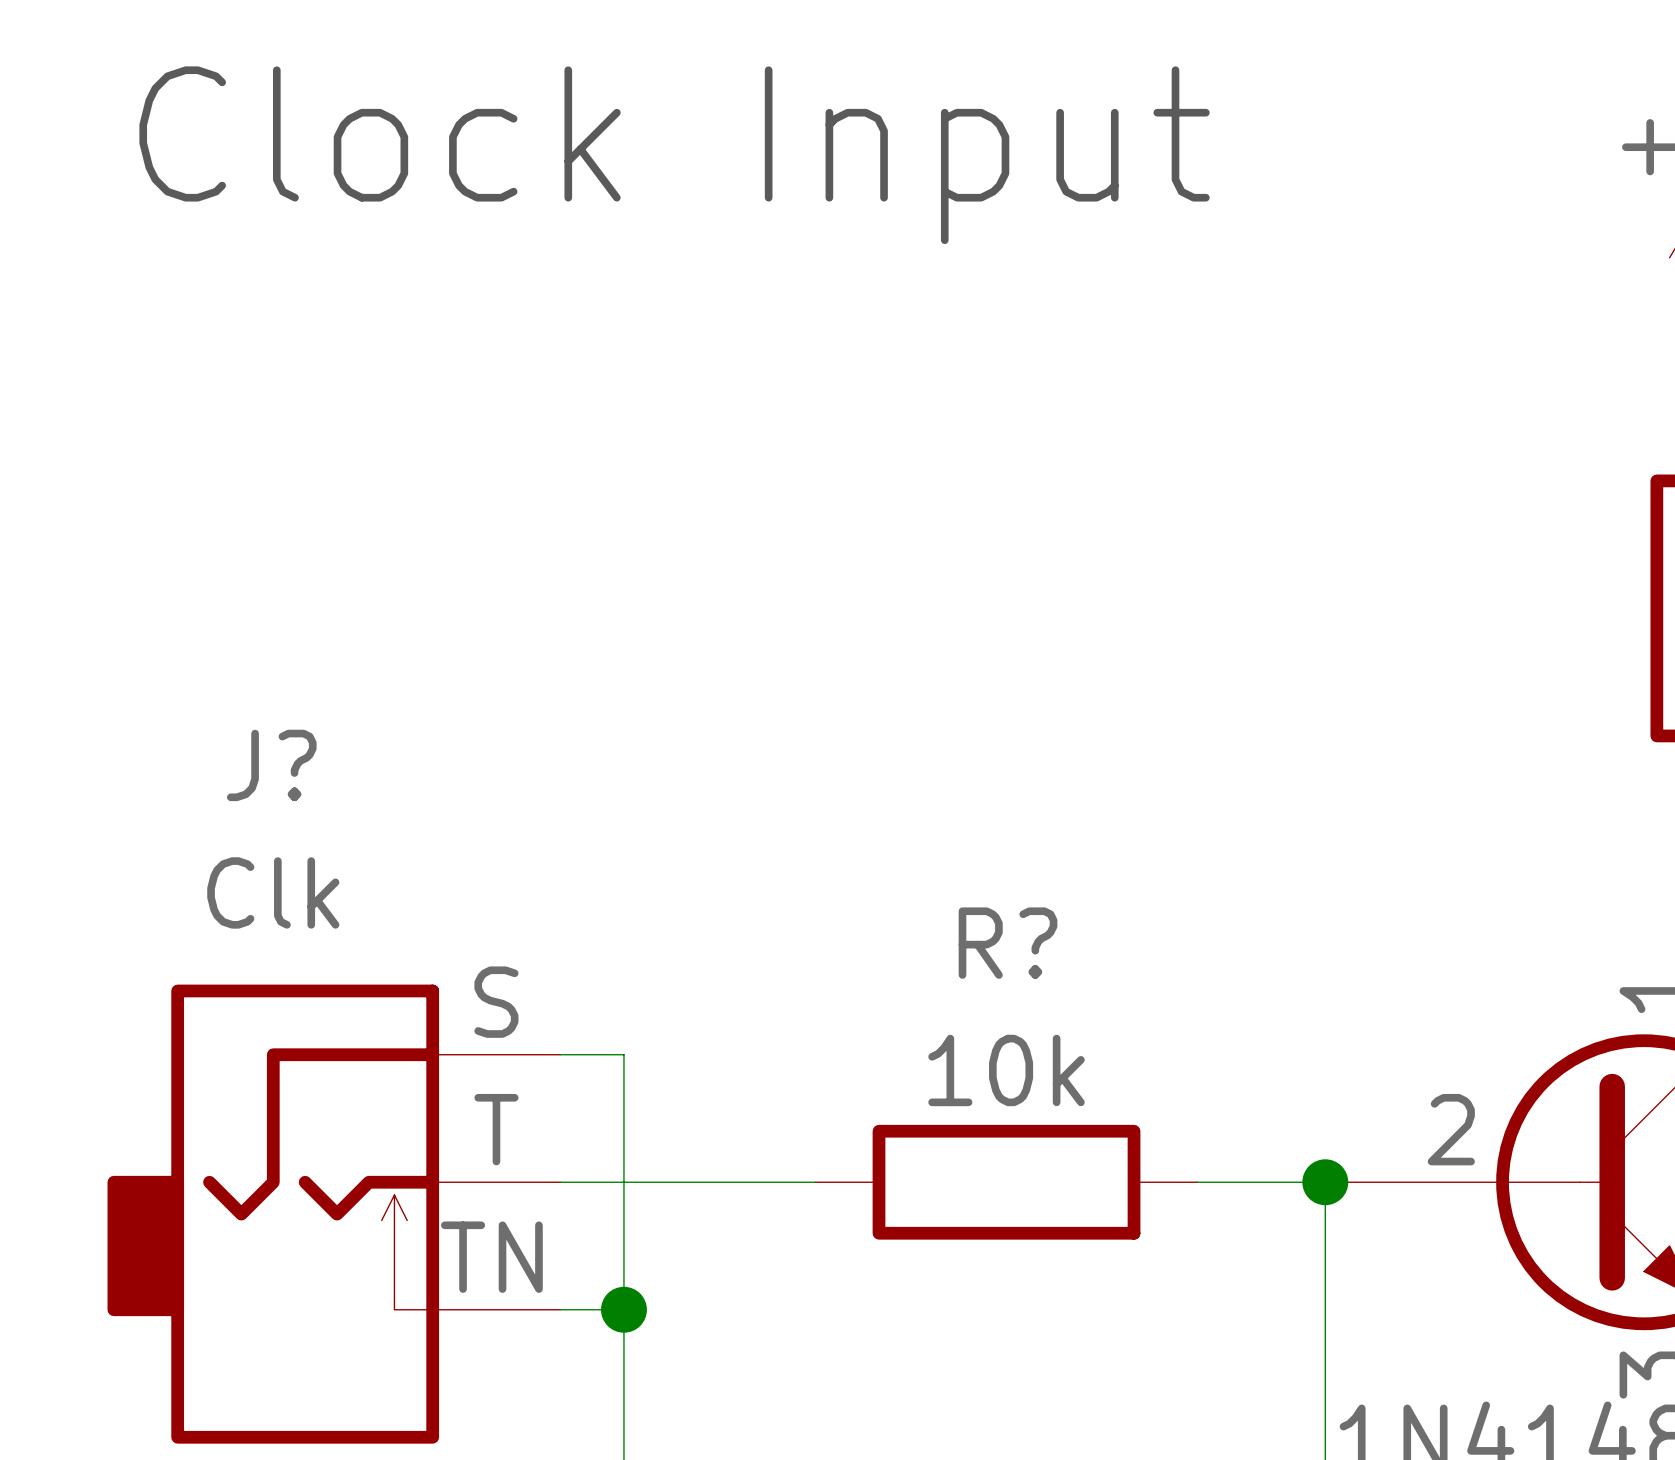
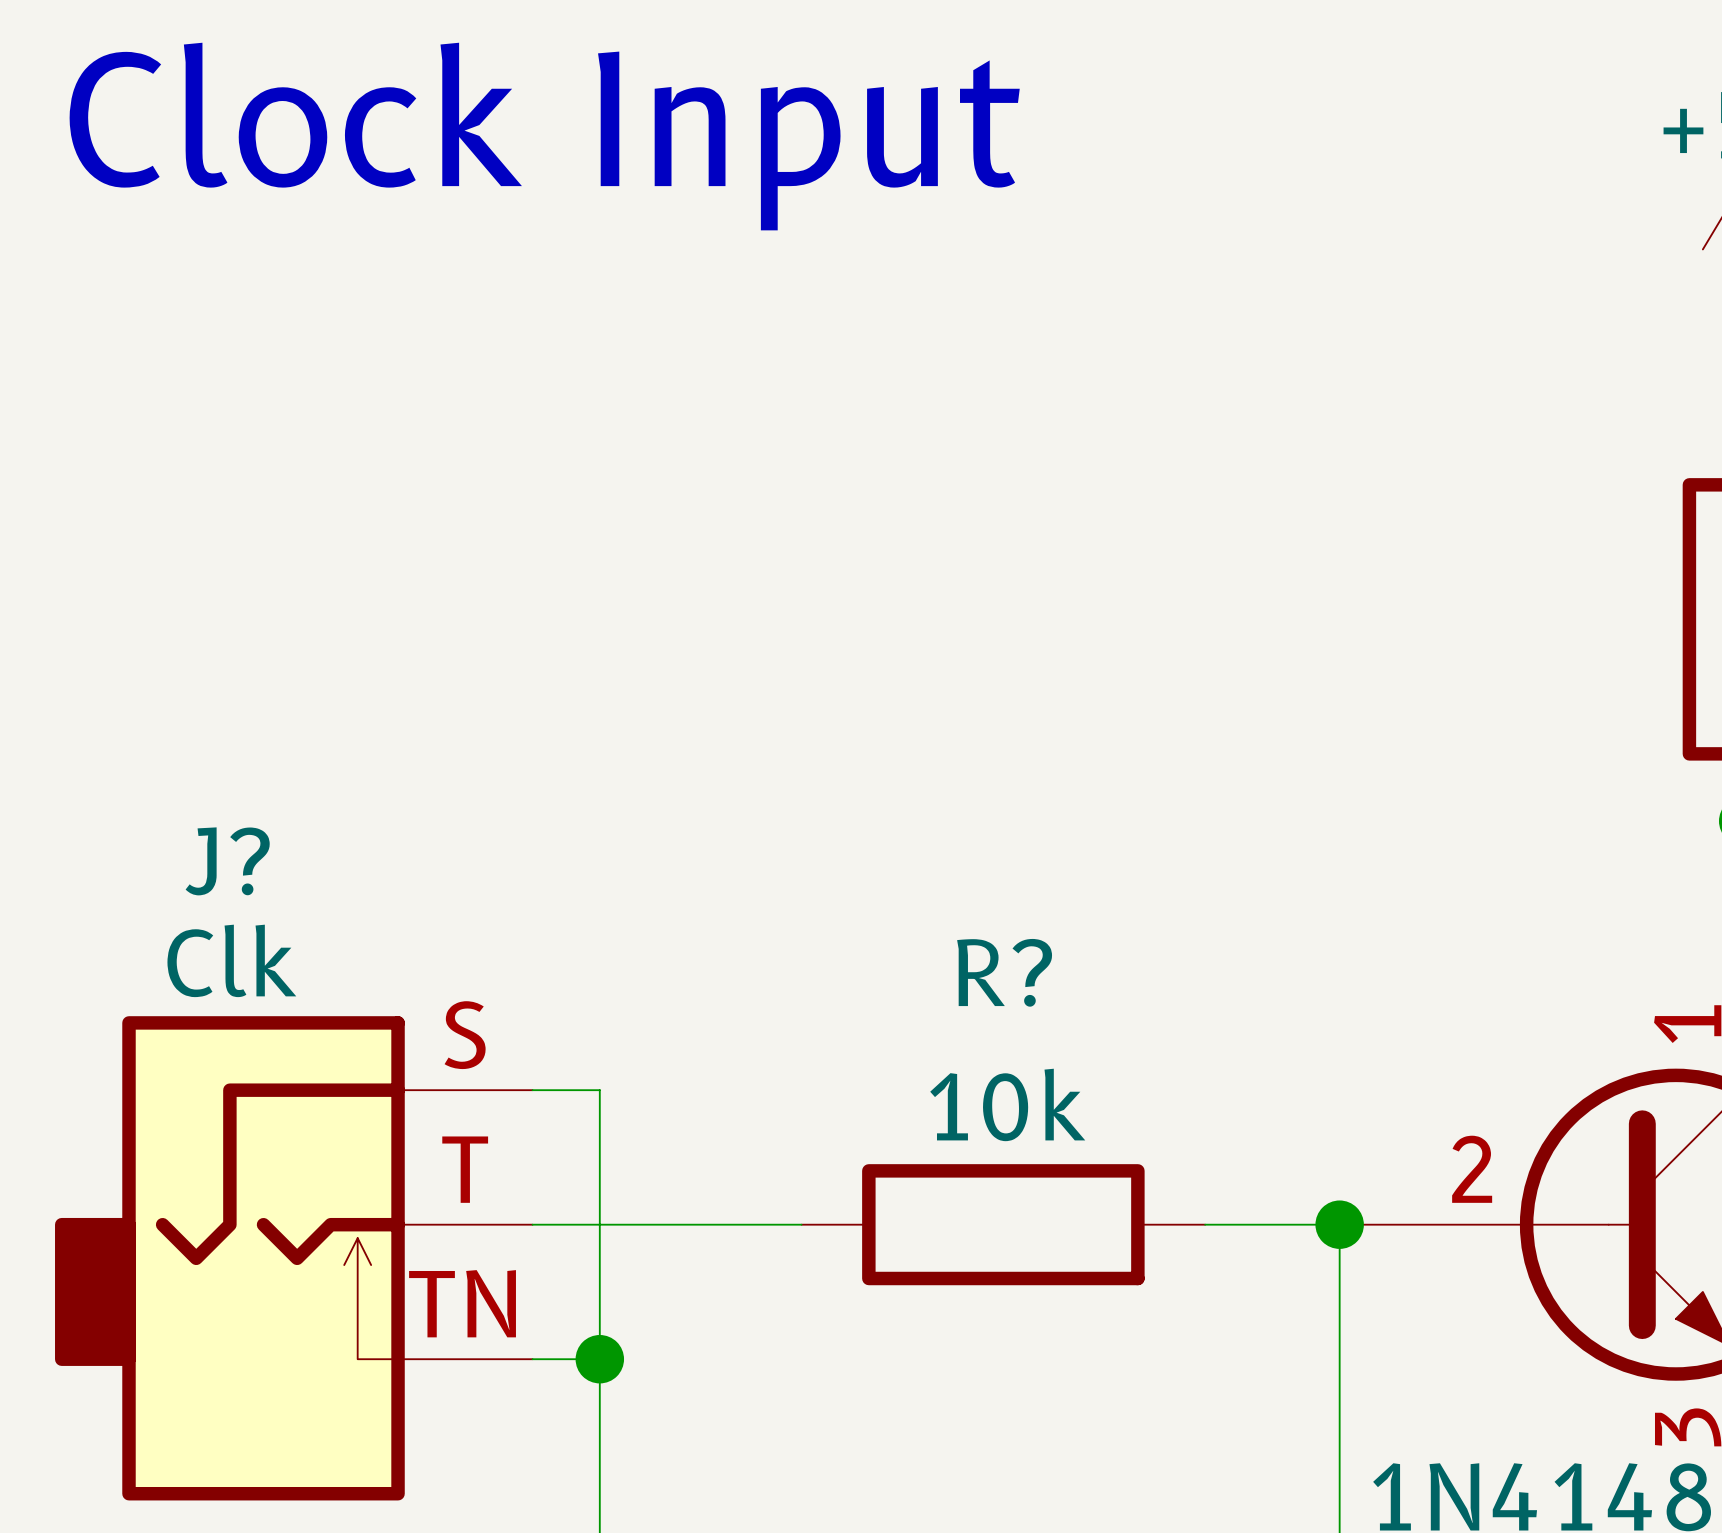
J? name position: J? (271, 765) -> J? (227, 861)
J? value position: Clk (273, 892) -> Clk (231, 960)

